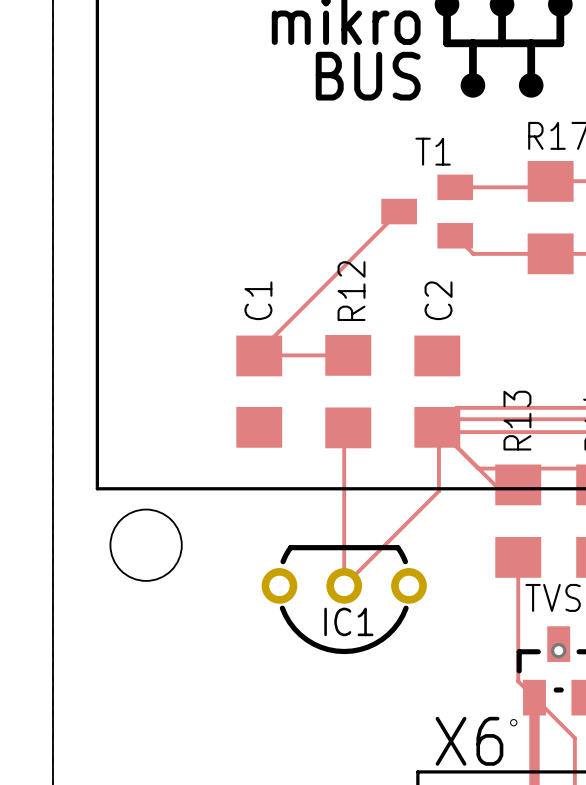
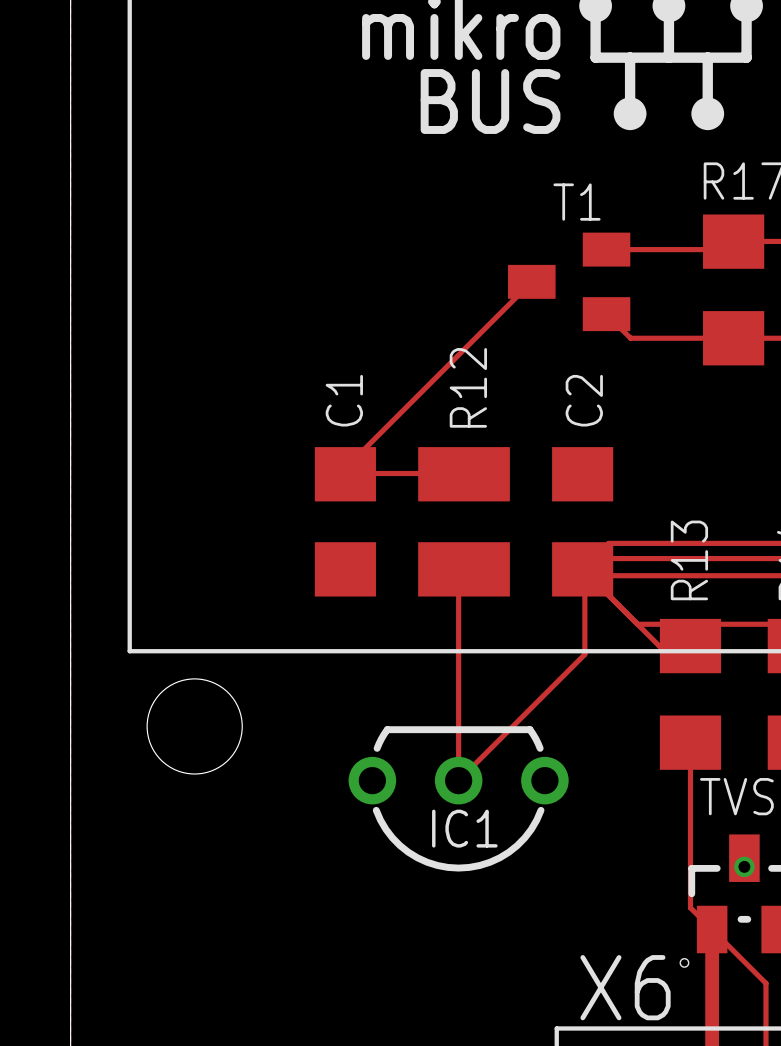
R12 footprint: [325, 335, 372, 449] -> [418, 447, 510, 597]

